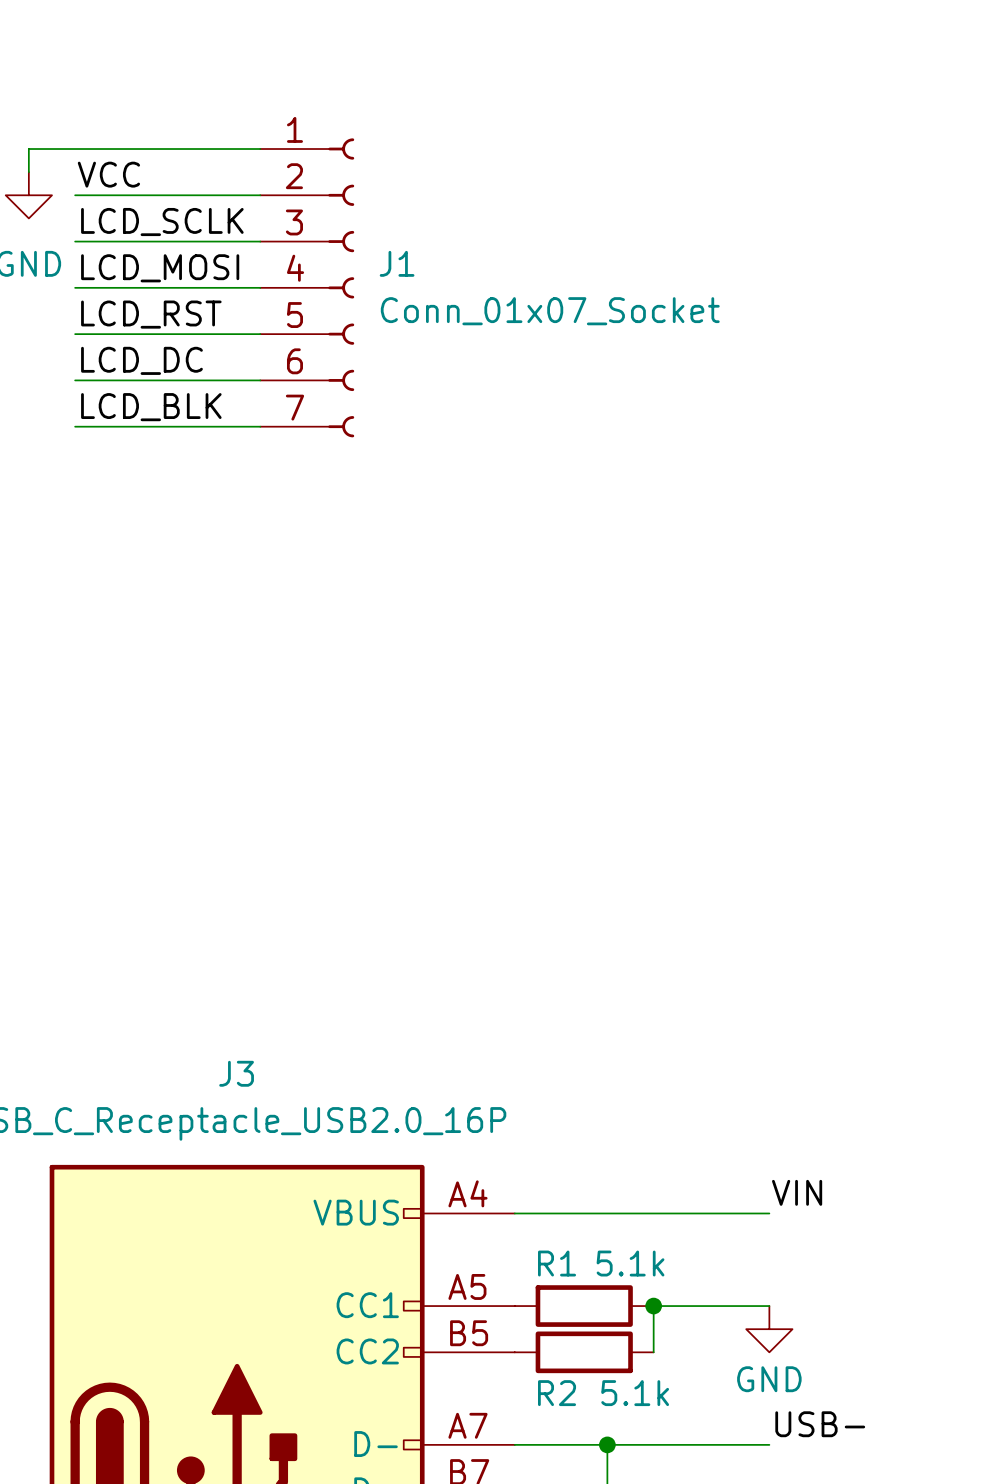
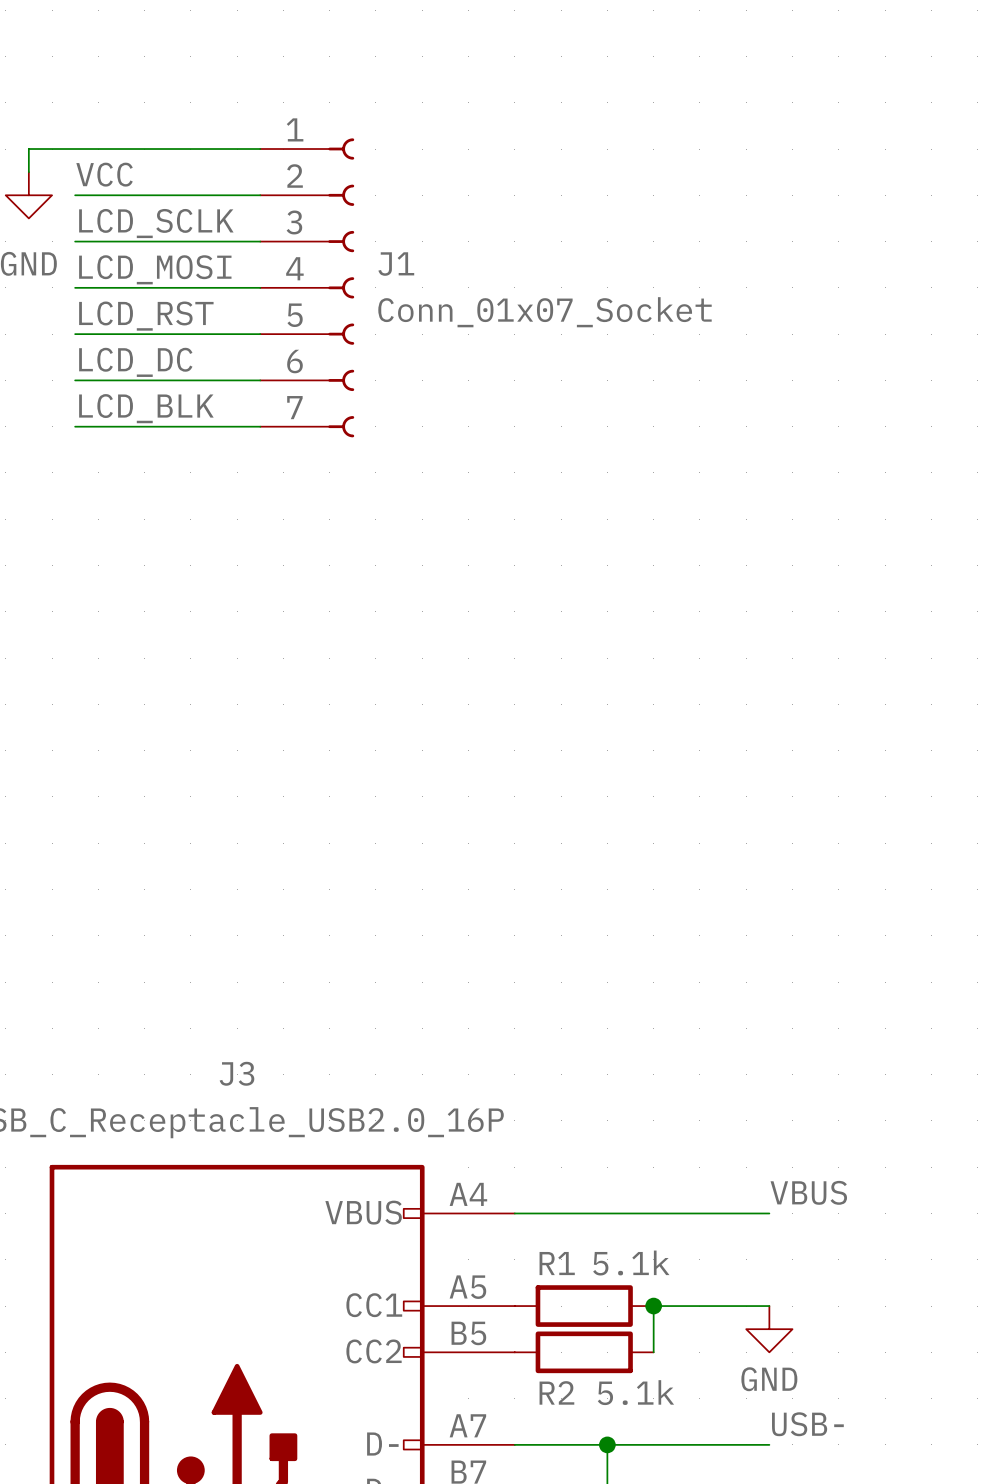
label: VIN (797, 1192) -> VBUS (808, 1192)

